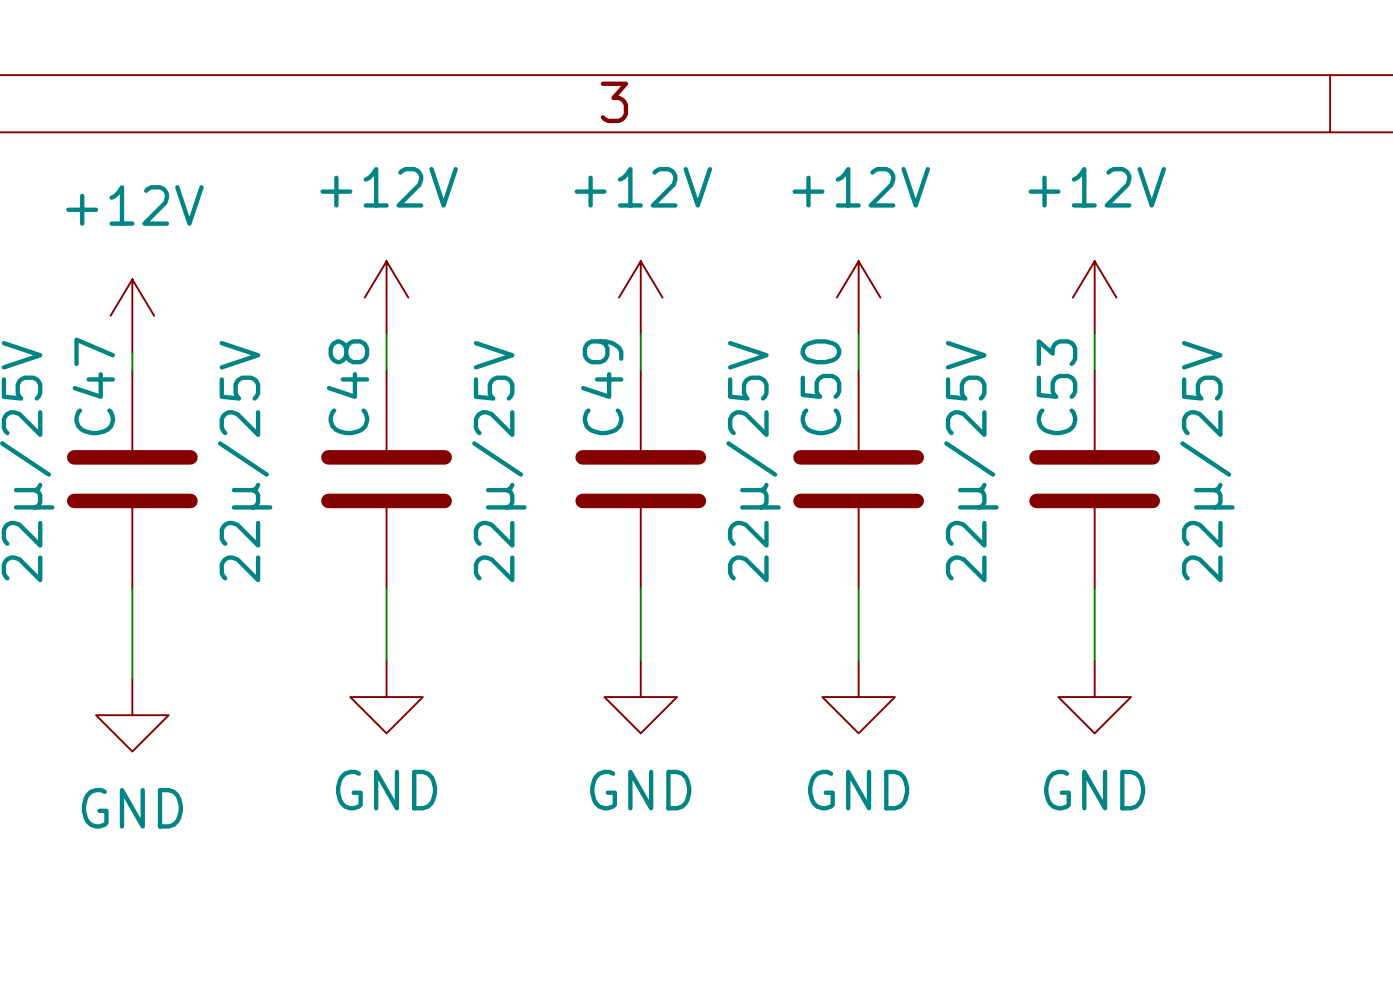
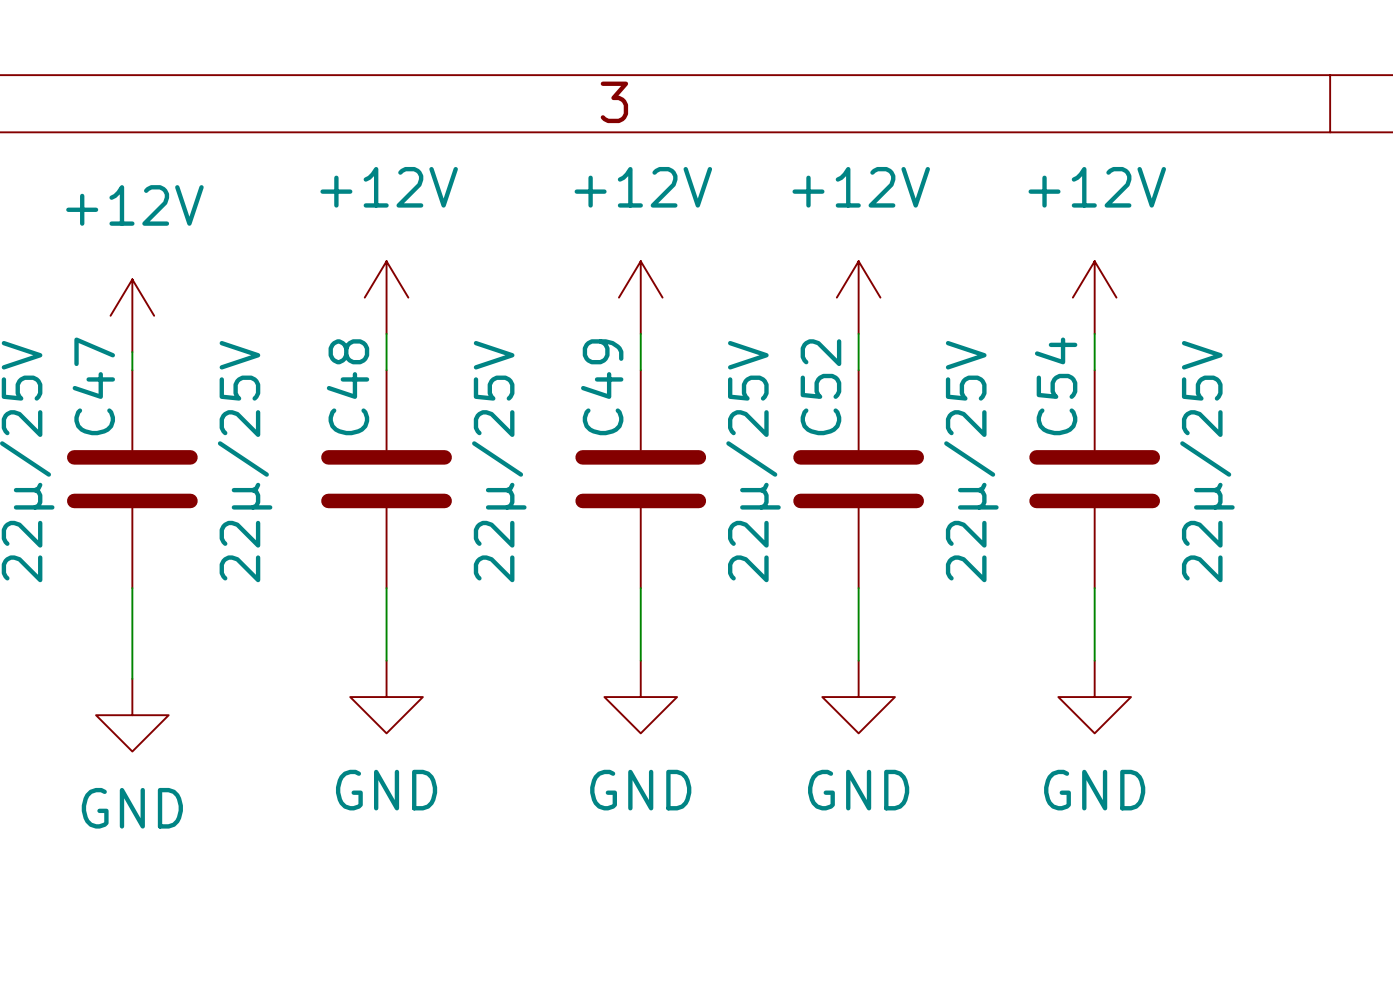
C50 name: C50 (820, 387) -> C52 (820, 387)
C53 name: C53 (1057, 387) -> C54 (1056, 386)

